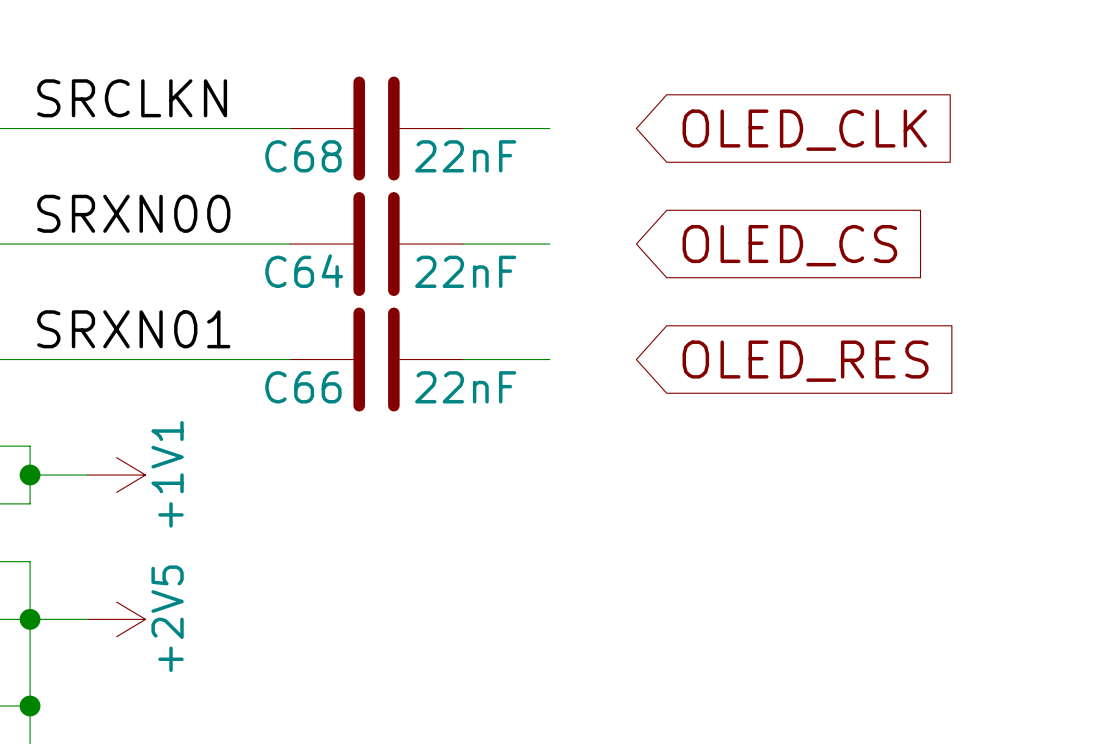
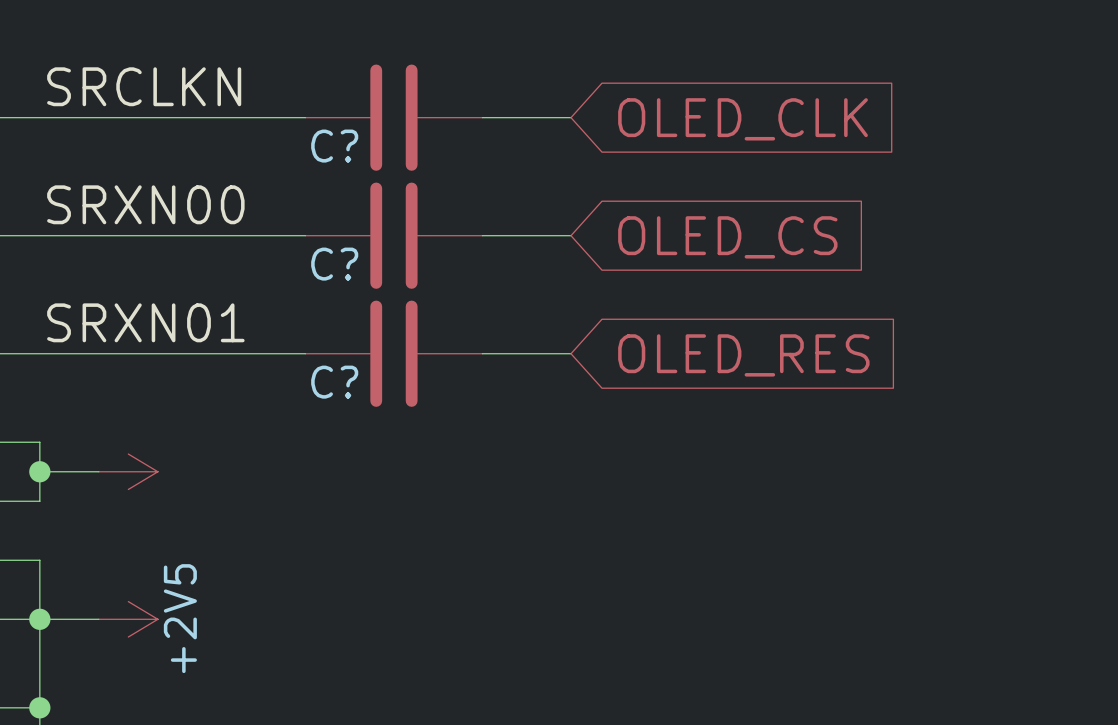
global label position: OLED_CLK (804, 130) -> OLED_CLK (743, 119)
C68 name: C68 (303, 156) -> C? (334, 146)
C68 value: 22nF (465, 156) -> none
global label position: OLED_CS (789, 245) -> OLED_CS (727, 237)
C64 name: C64 (304, 271) -> C? (334, 264)
C64 value: 22nF (465, 271) -> none
global label position: OLED_RES (805, 361) -> OLED_RES (743, 355)
C66 name: C66 (303, 387) -> C? (334, 382)
C66 value: 22nF (465, 387) -> none
power symbol text: +1V1 (167, 474) -> none

